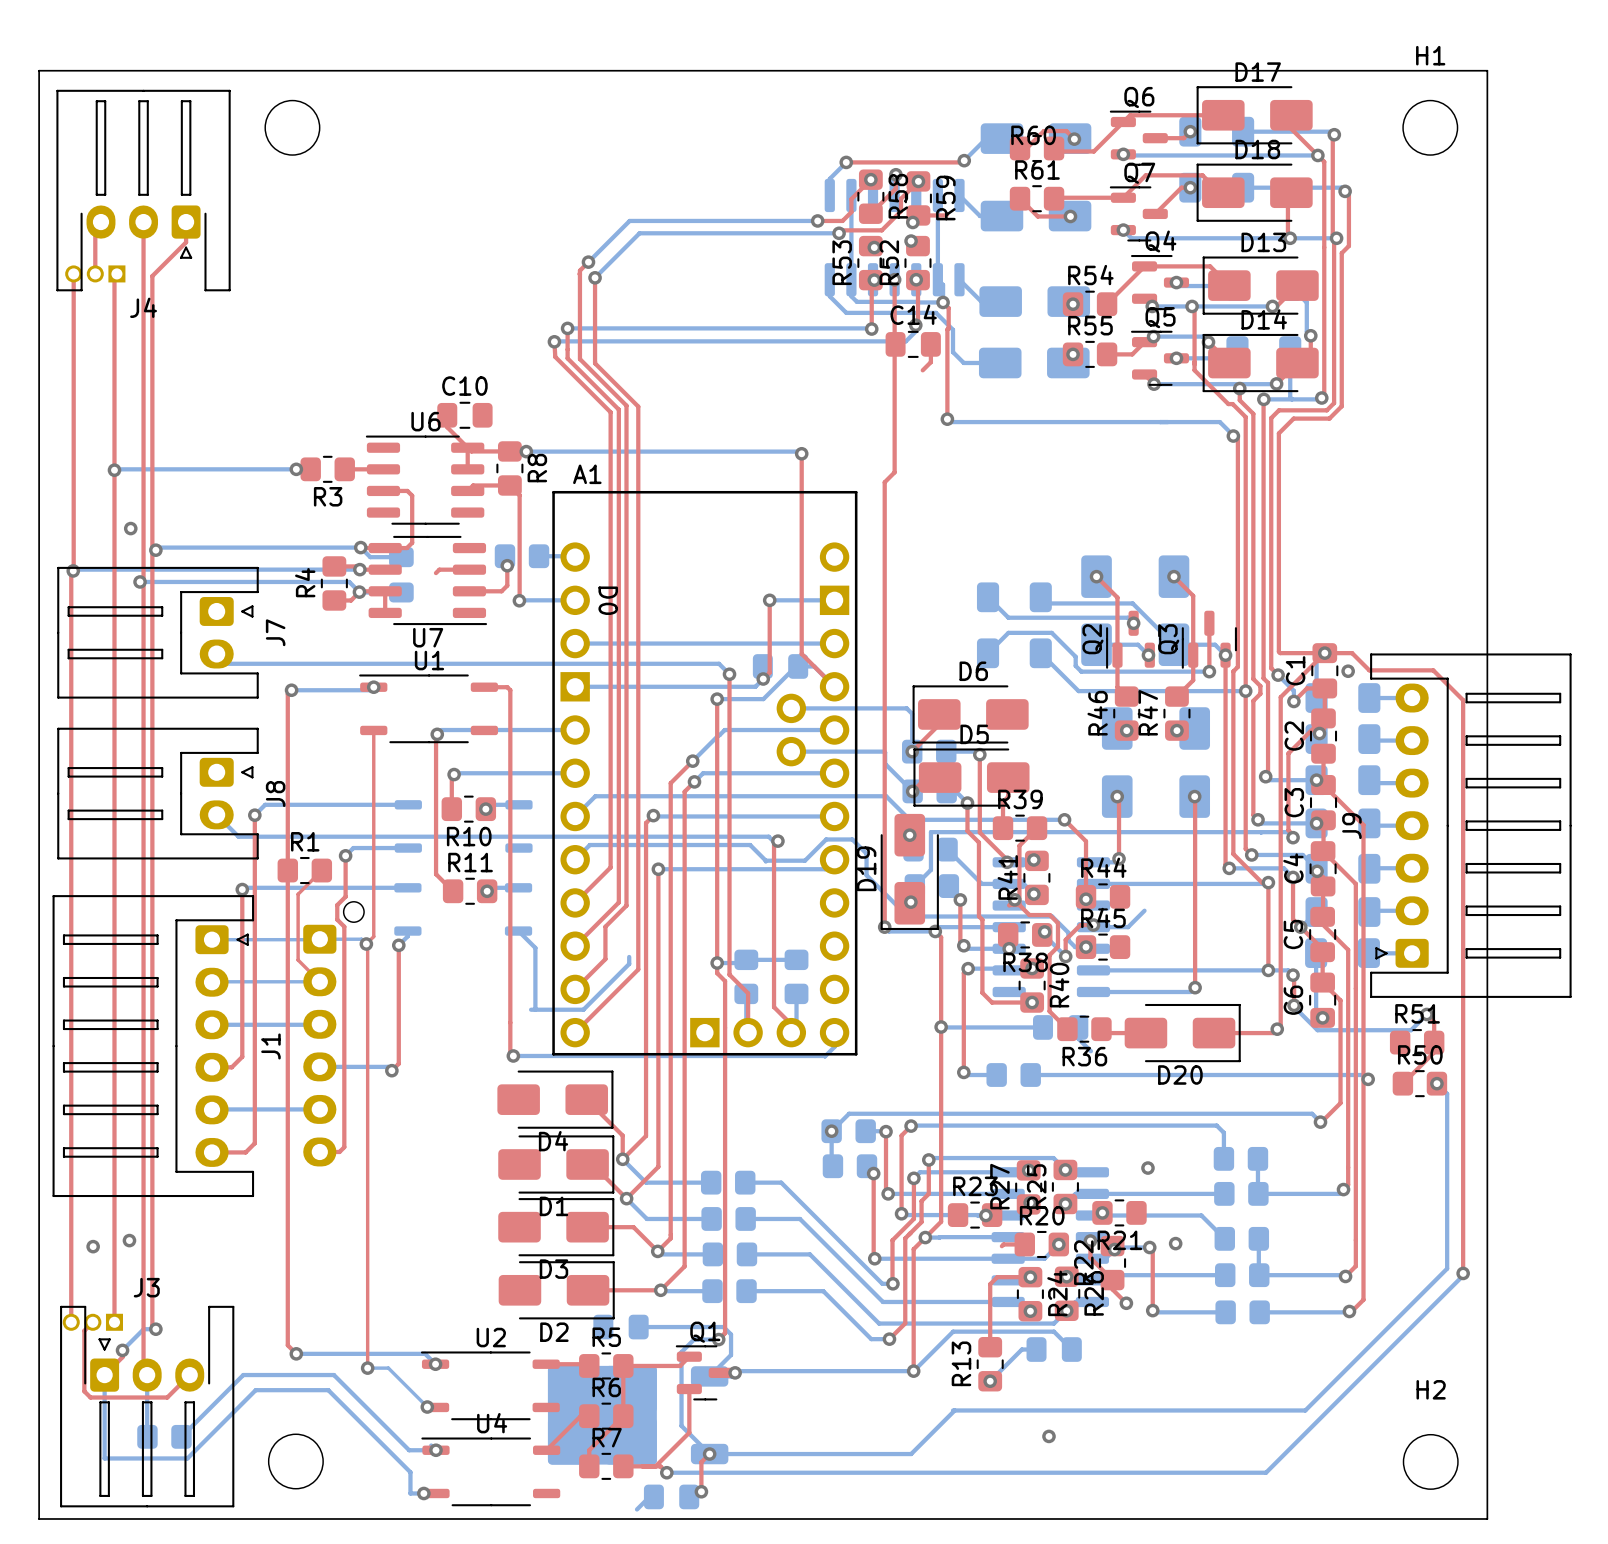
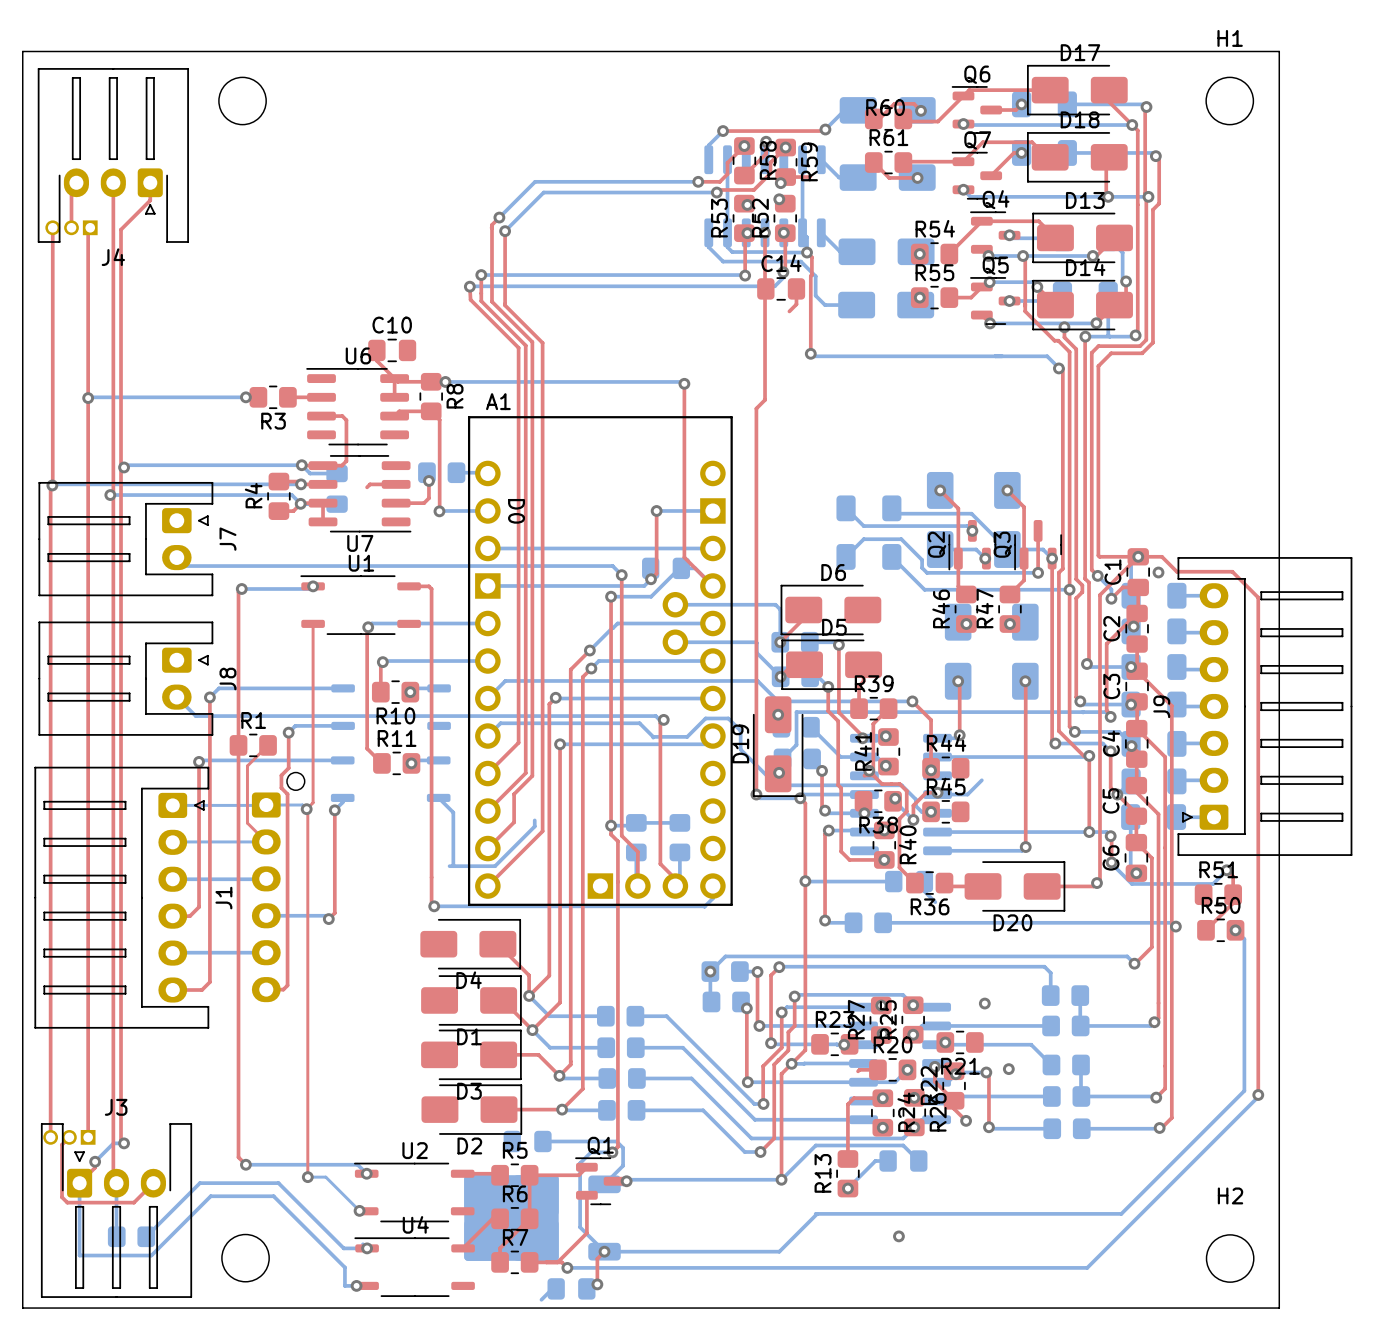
via: (130, 528) -> none
via: (129, 1240) -> none
via: (93, 1246) -> none

